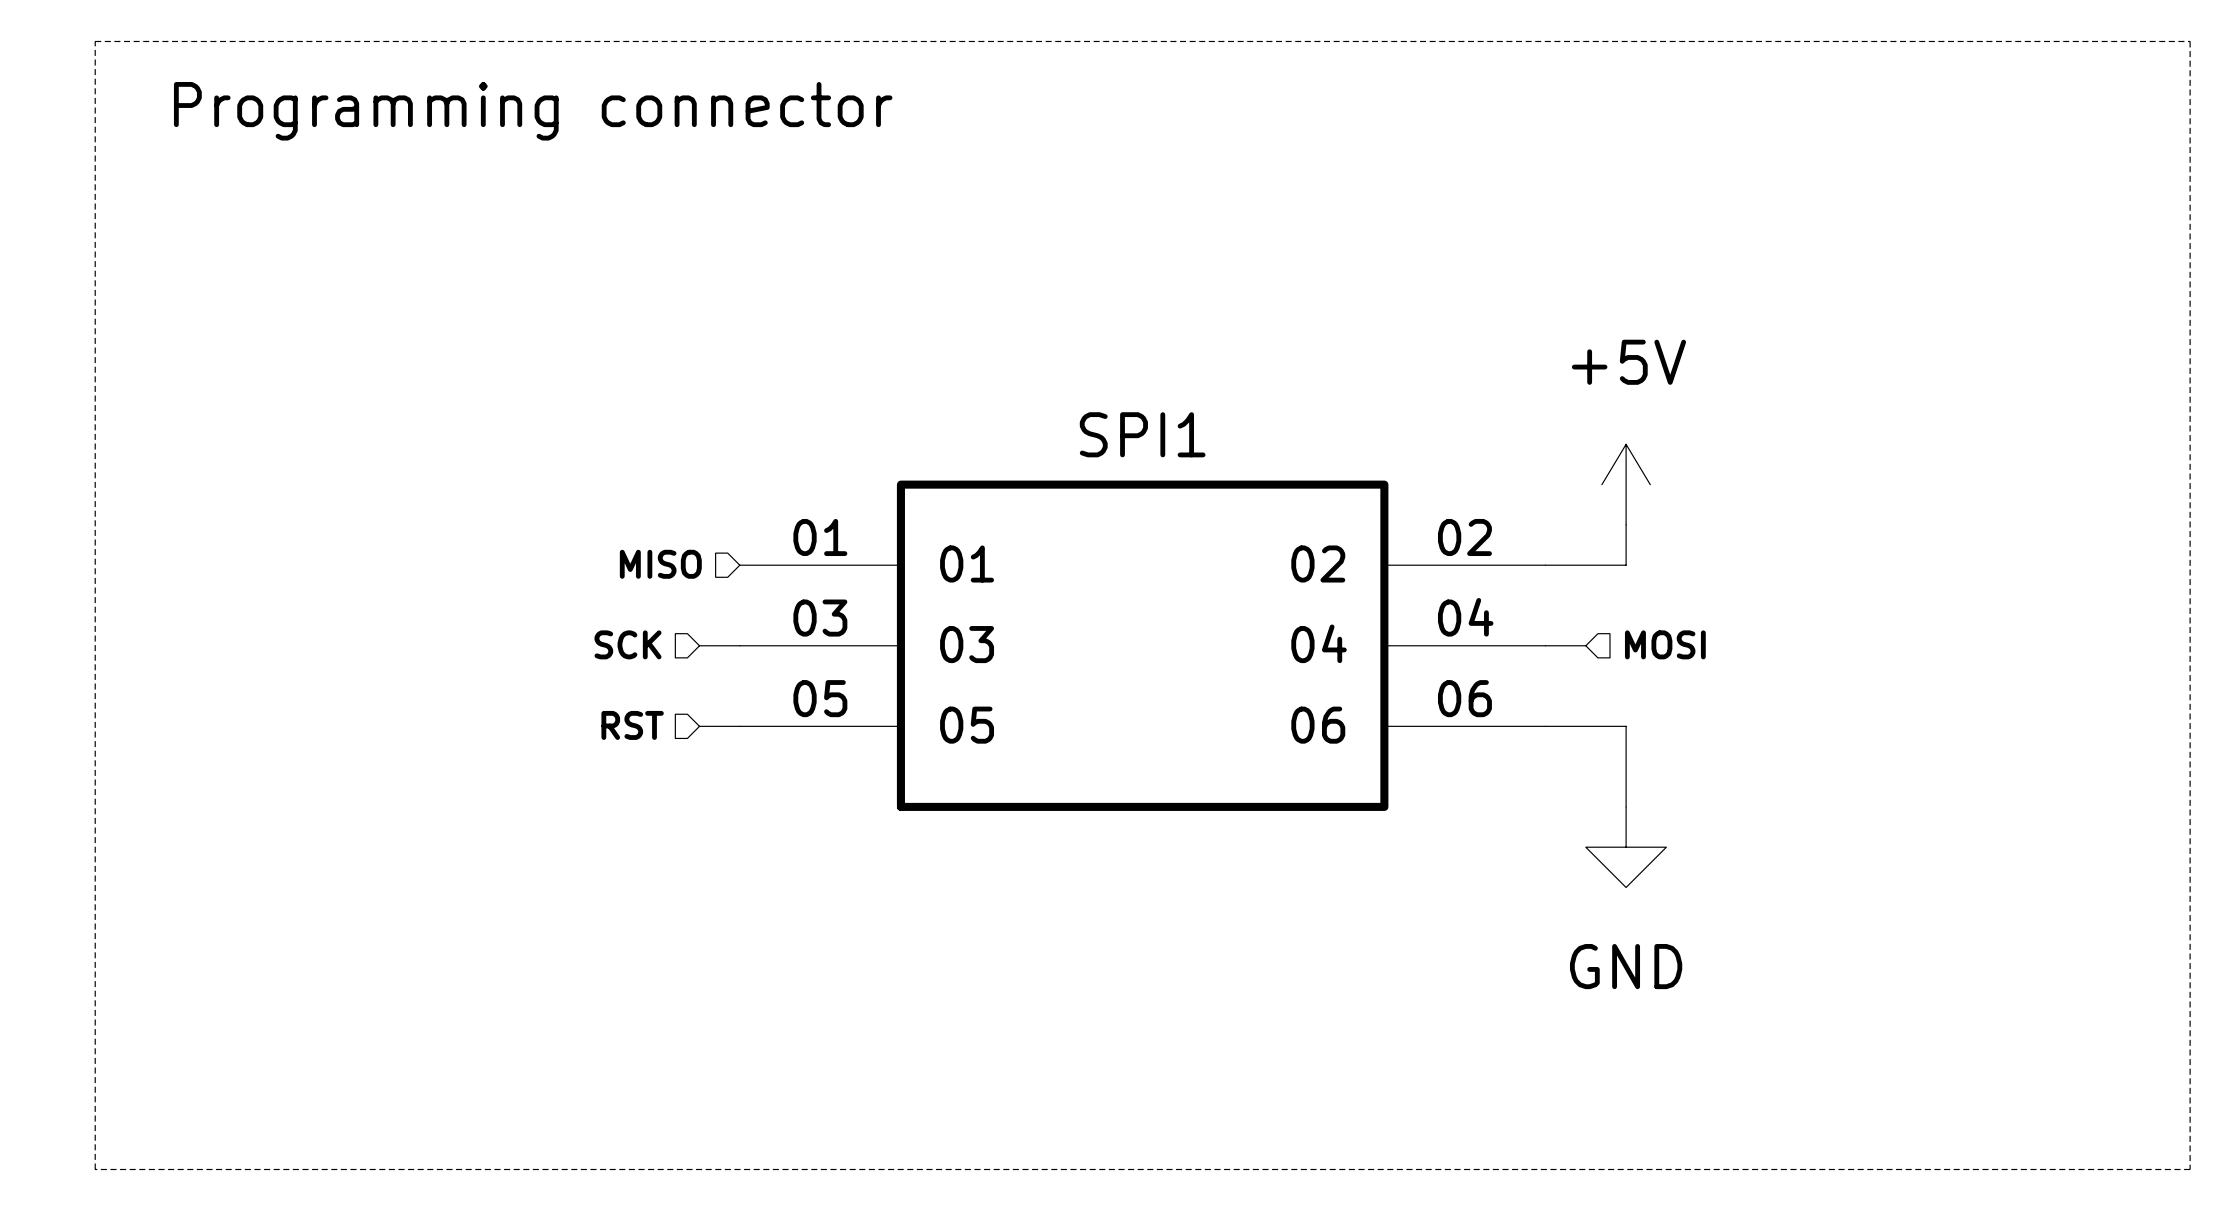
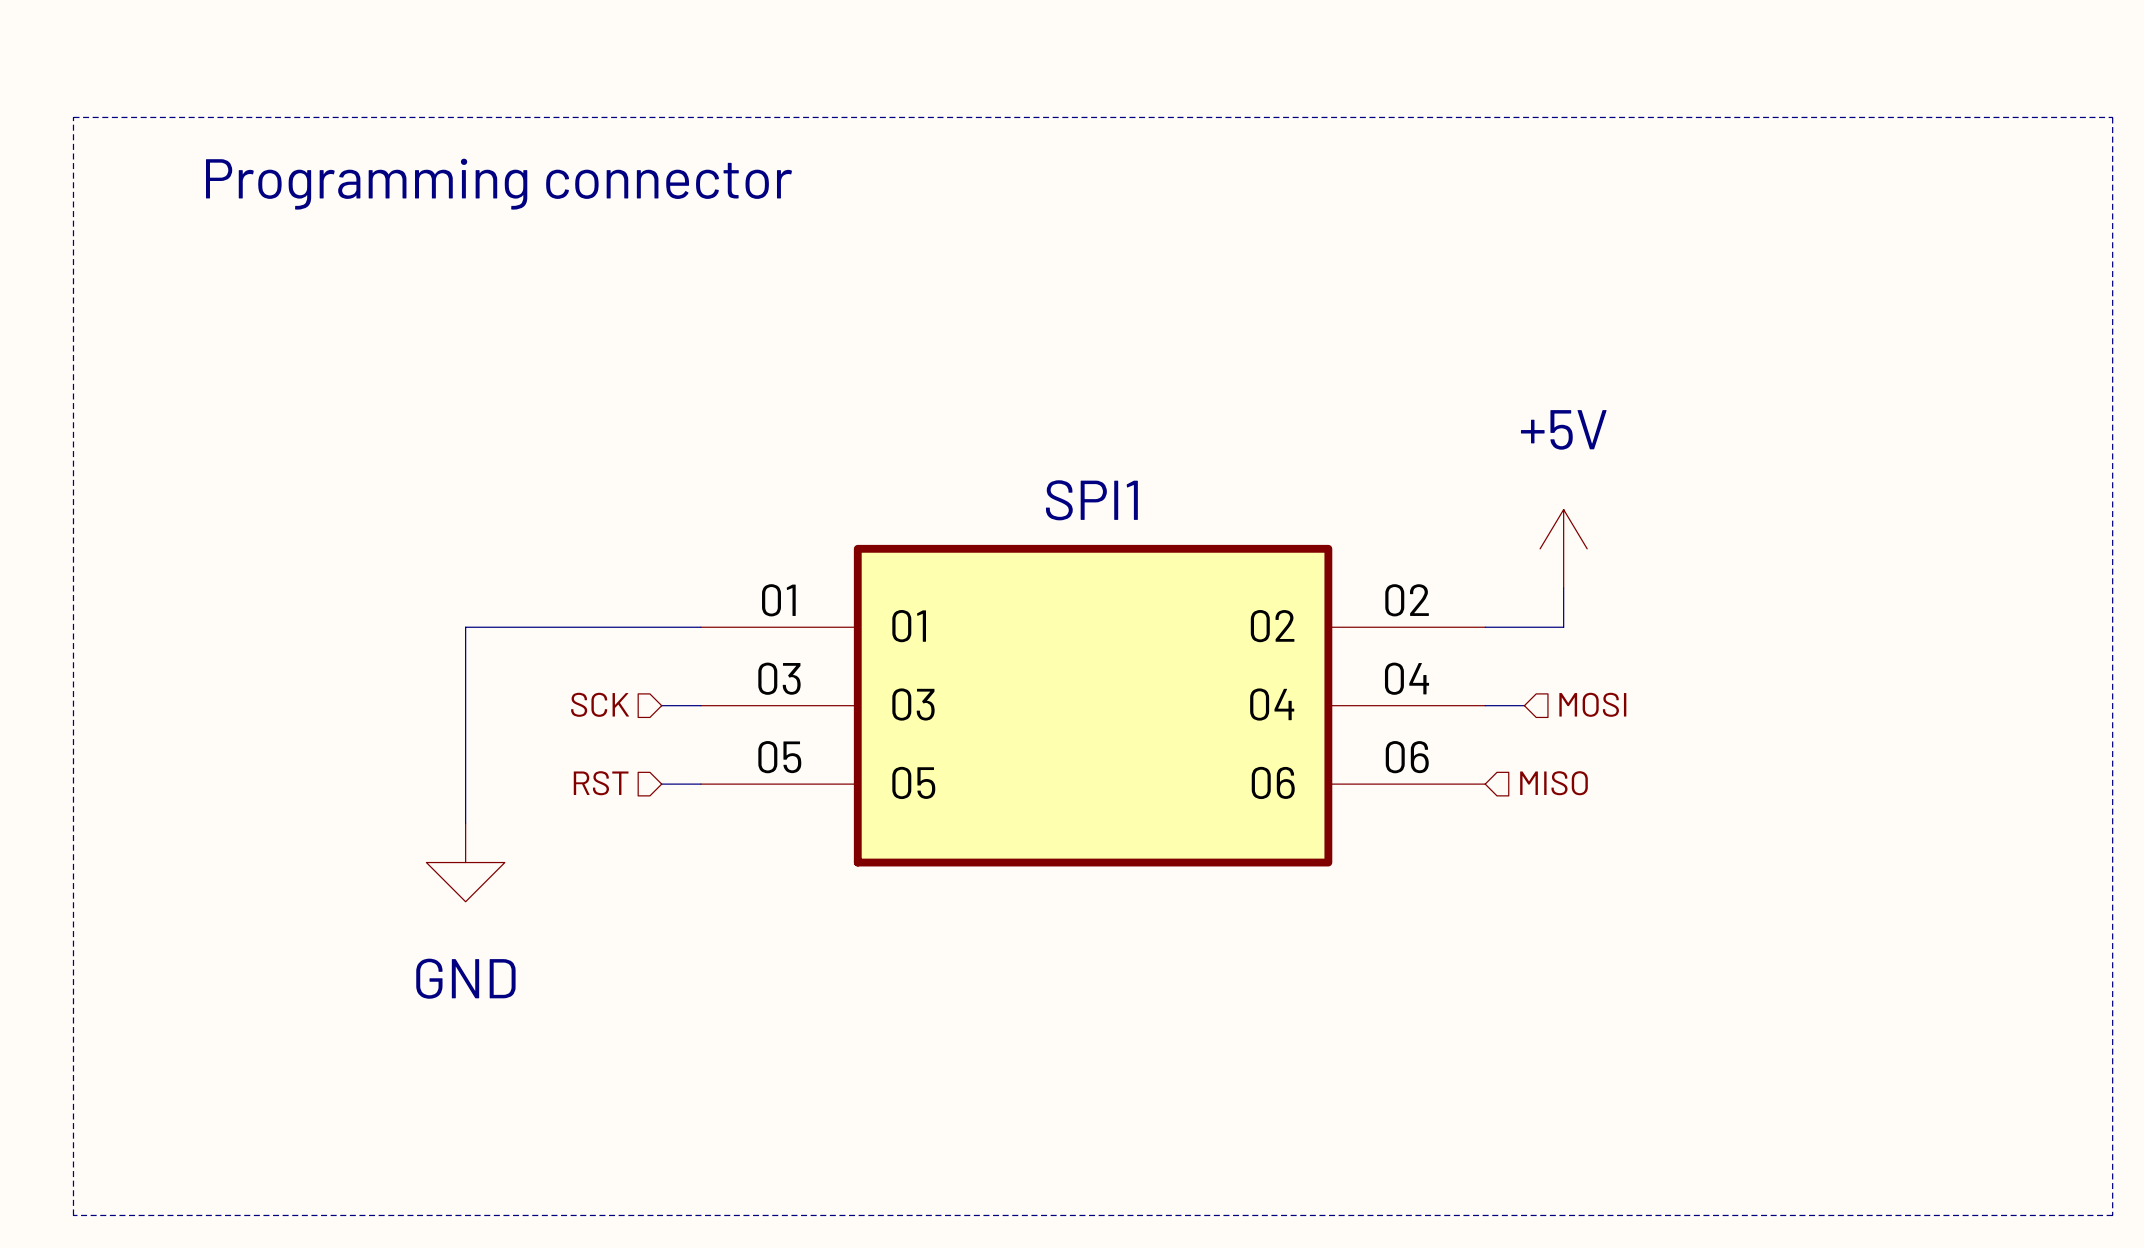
hierarchical label: MISO (660, 564) -> none
wire: none -> (700, 627) (465, 627) (465, 823)
hierarchical label: none -> MISO (1553, 783)
wire: (1545, 726) (1626, 726) (1626, 806) -> none
power symbol: none -> GND (465, 862)
power symbol: GND (1626, 847) -> none

